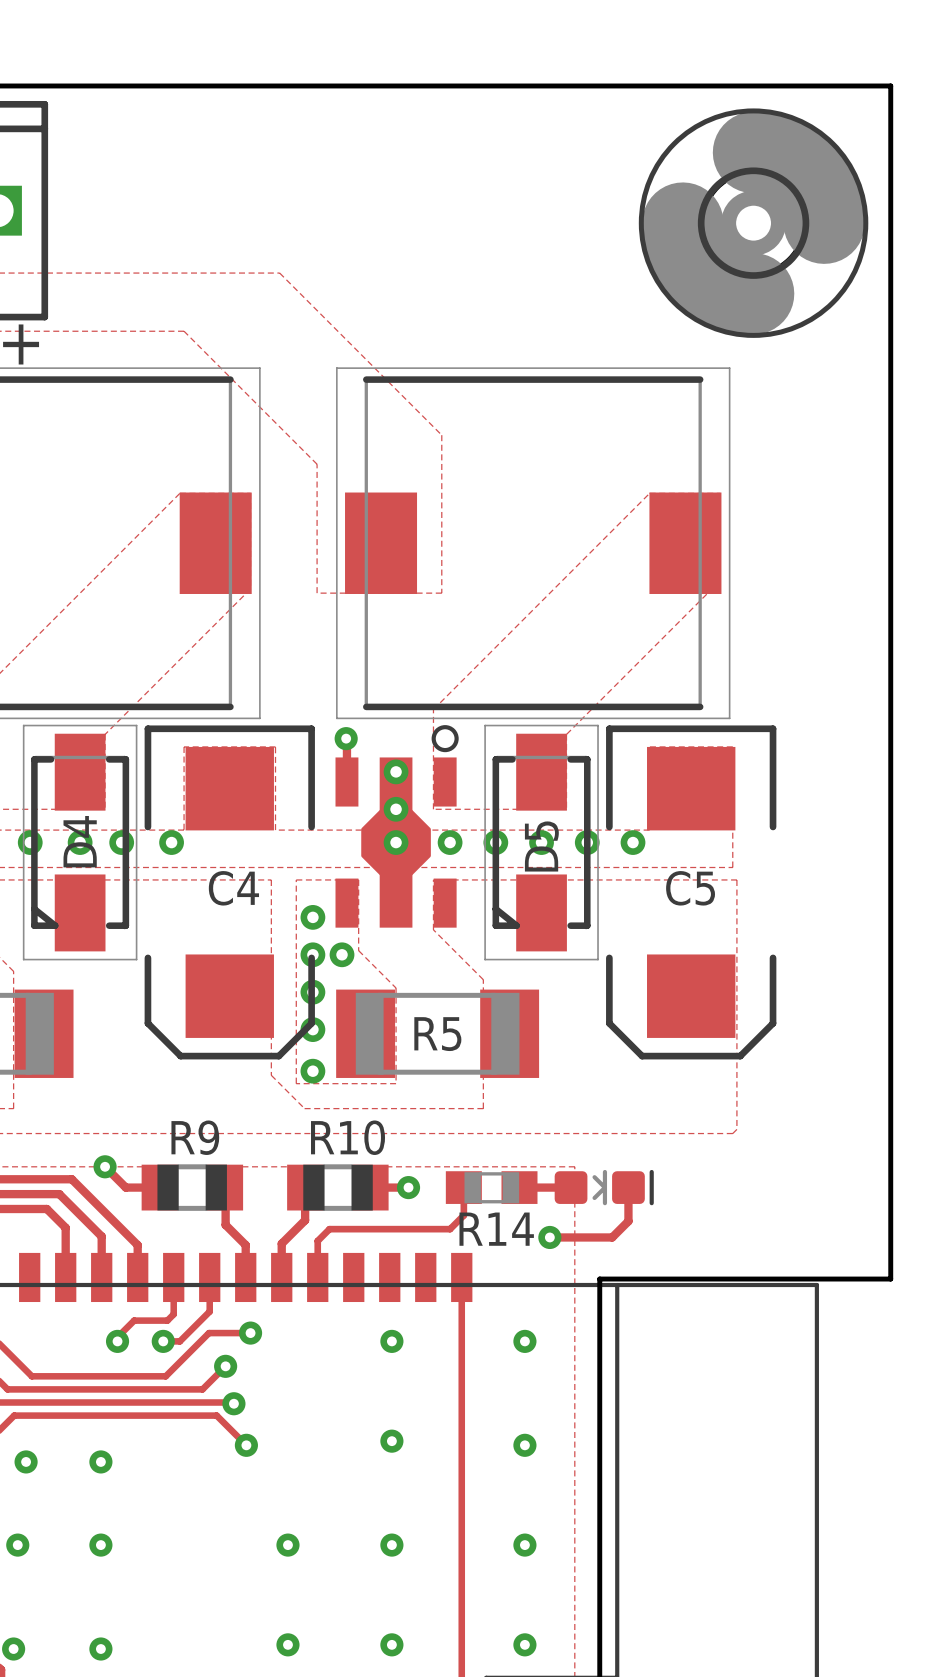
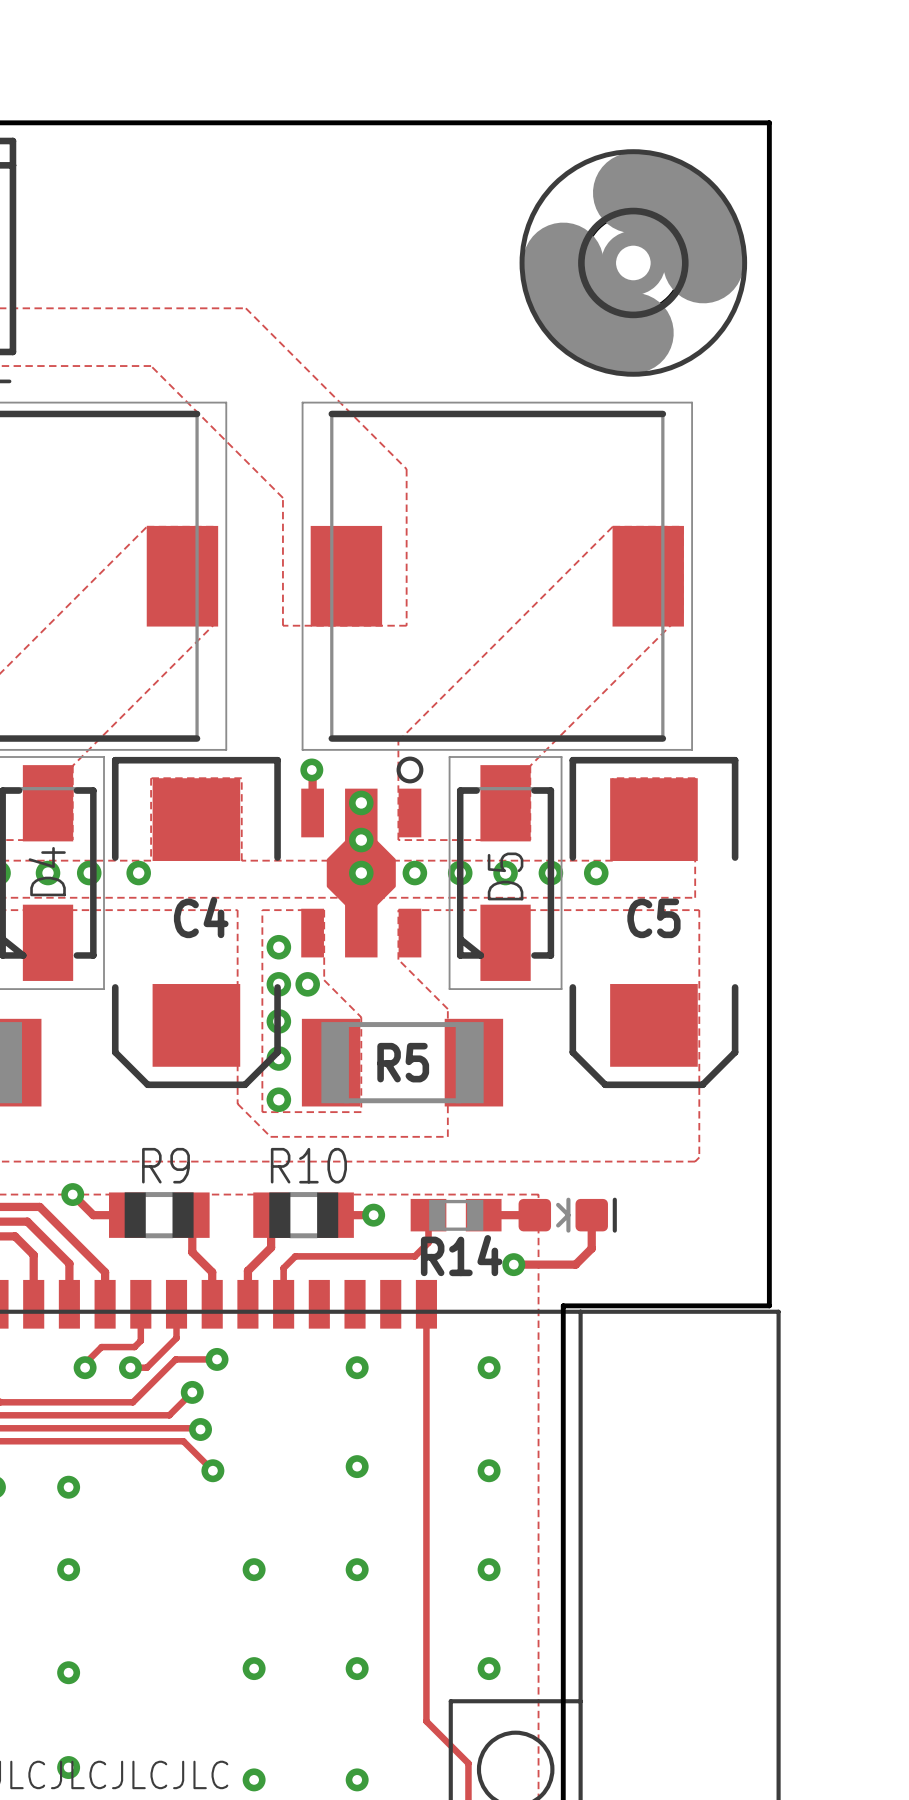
board edge: (807, 85) (890, 85) (890, 1279) (807, 1279) -> (769, 122) (769, 1305)
part position: (753, 223) -> (633, 262)

